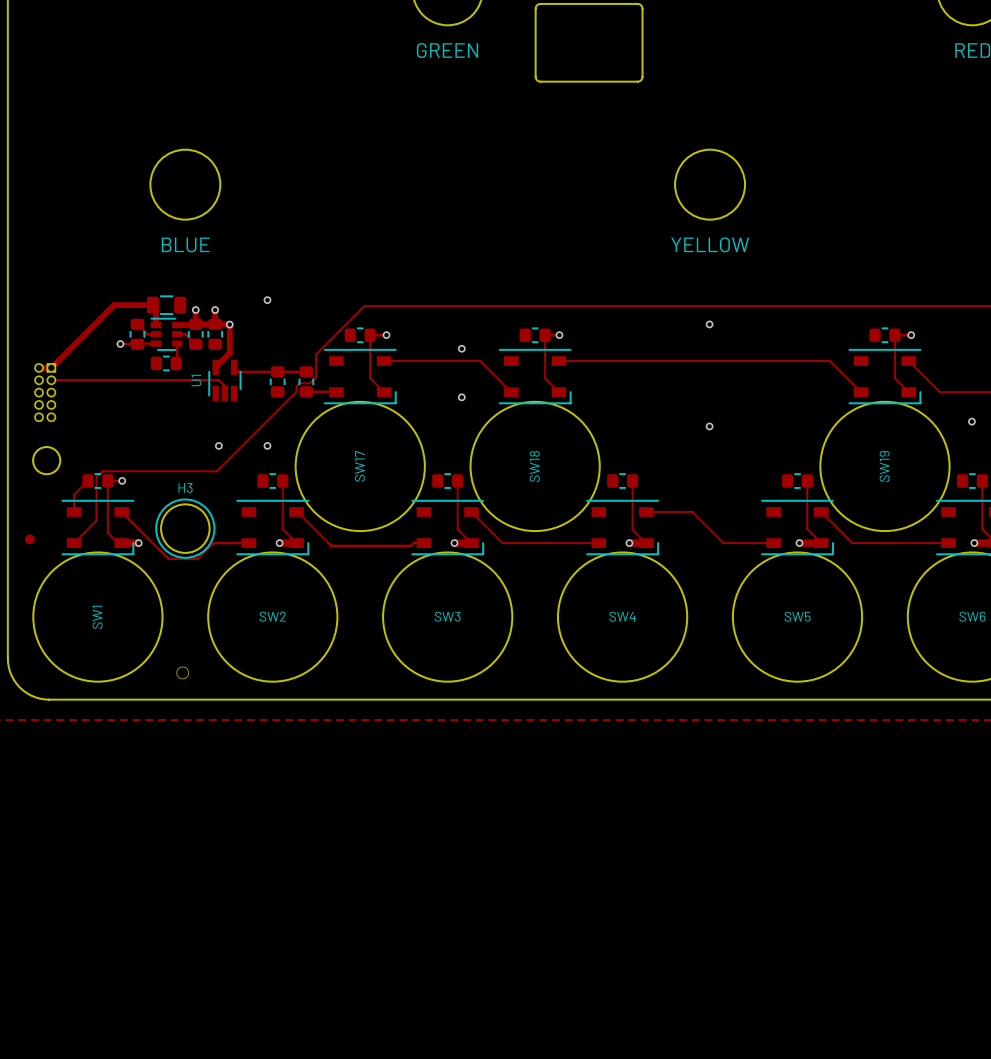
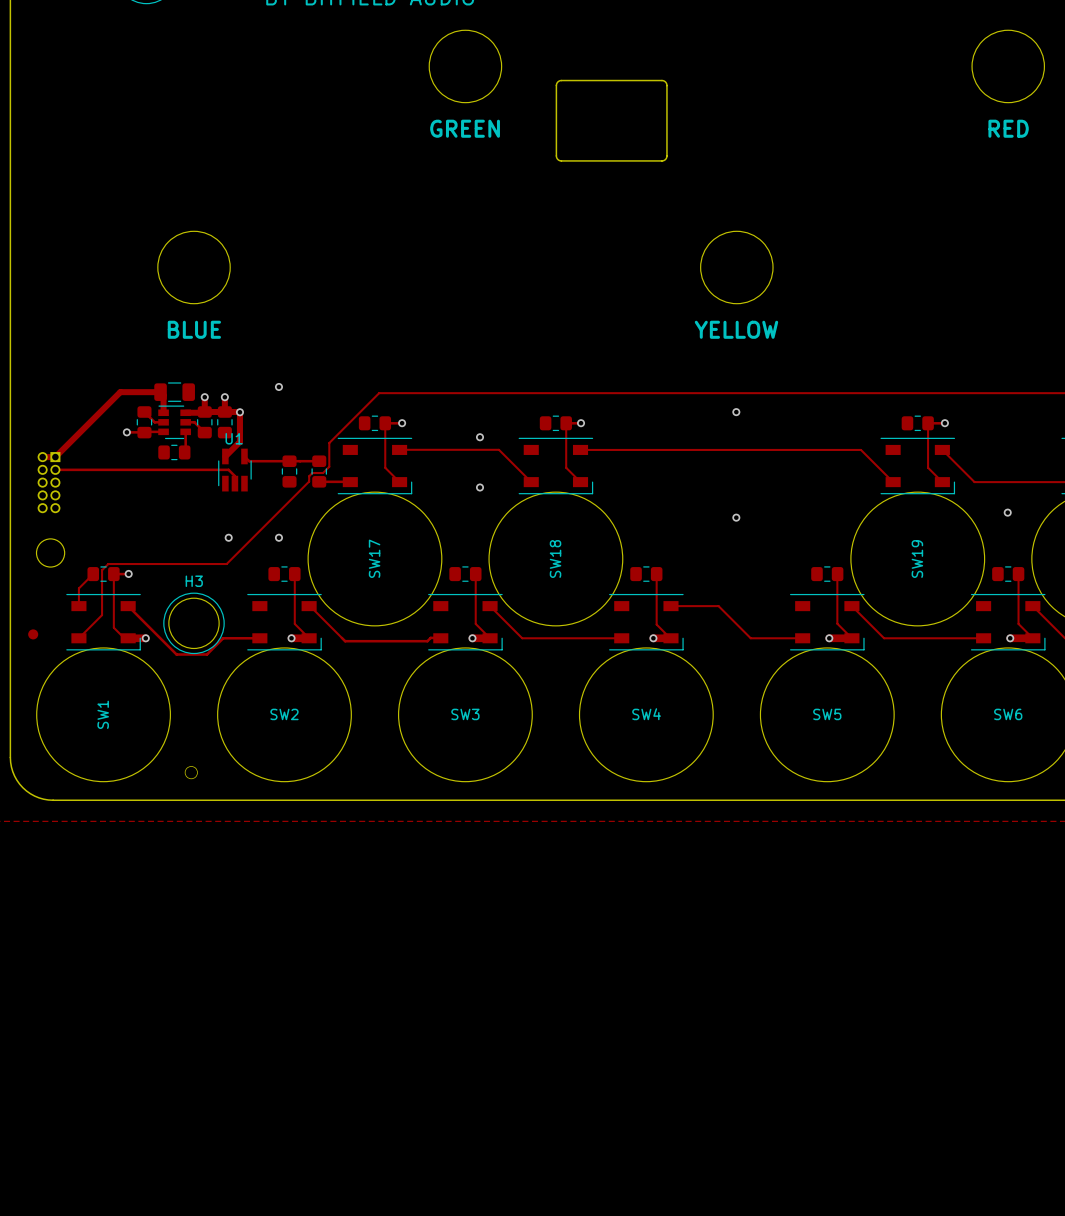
U1 name rotation: 0° (196, 380) -> 90° clockwise (234, 438)
U1 name position: U1 (196, 380) -> U1 (234, 438)

